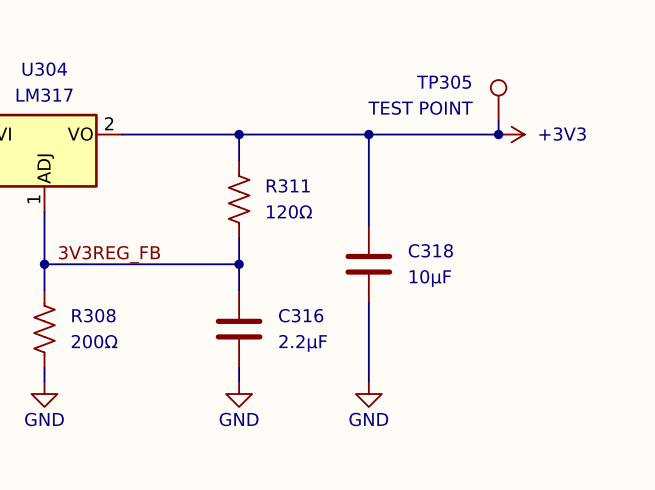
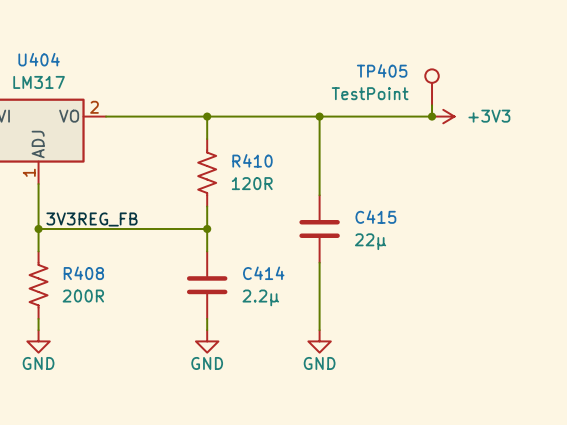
U304 name: U304 (44, 69) -> U404 (39, 59)
TP305 name: TP305 (444, 82) -> TP405 (382, 70)
TP305 value: TEST POINT (420, 108) -> TestPoint (370, 93)
R311 name: R311 (288, 185) -> R410 (252, 160)
R311 value: 120Ω (289, 211) -> 120R (252, 183)
C318 name: C318 (430, 250) -> C415 (375, 217)
C318 value: 10µF (430, 278) -> 22µ (370, 241)
R308 name: R308 (93, 315) -> R408 (83, 273)
C316 name: C316 (301, 315) -> C414 (263, 273)
R308 value: 200Ω (94, 341) -> 200R (83, 296)
C316 value: 2.2µF (303, 343) -> 2.2µ (260, 297)

